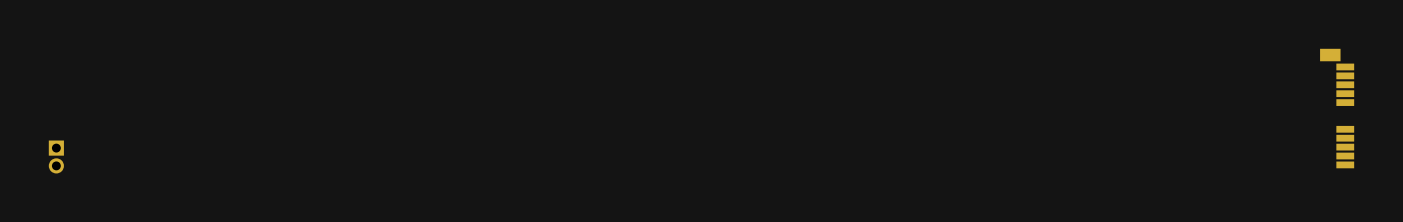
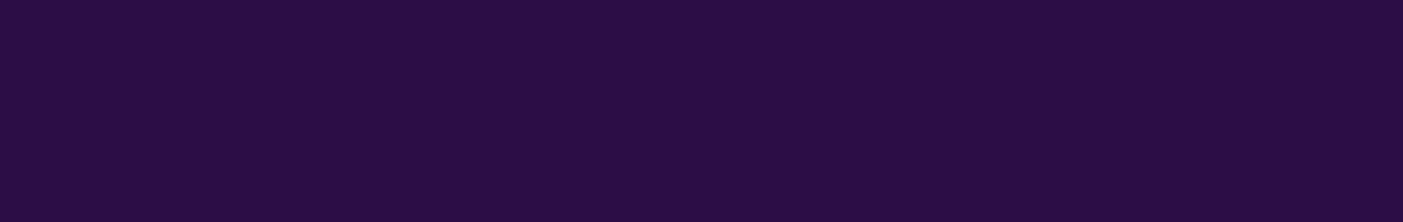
part: (1337, 108) -> none
part: (56, 156) -> none

